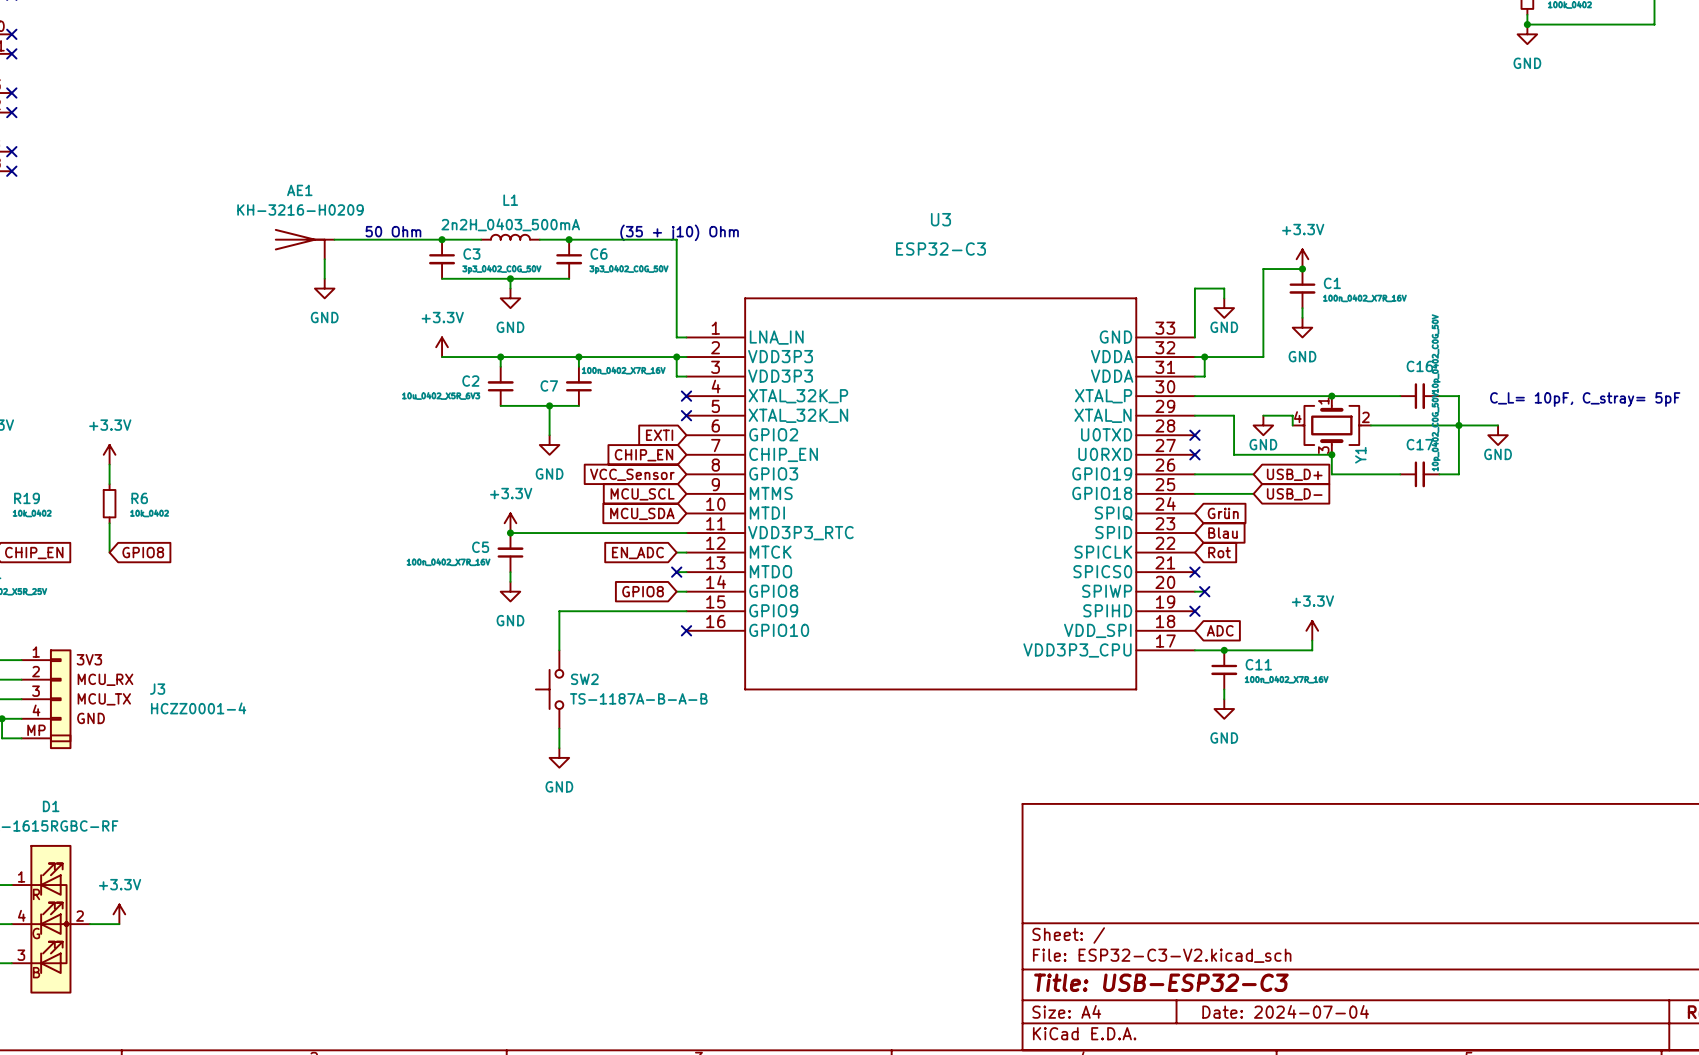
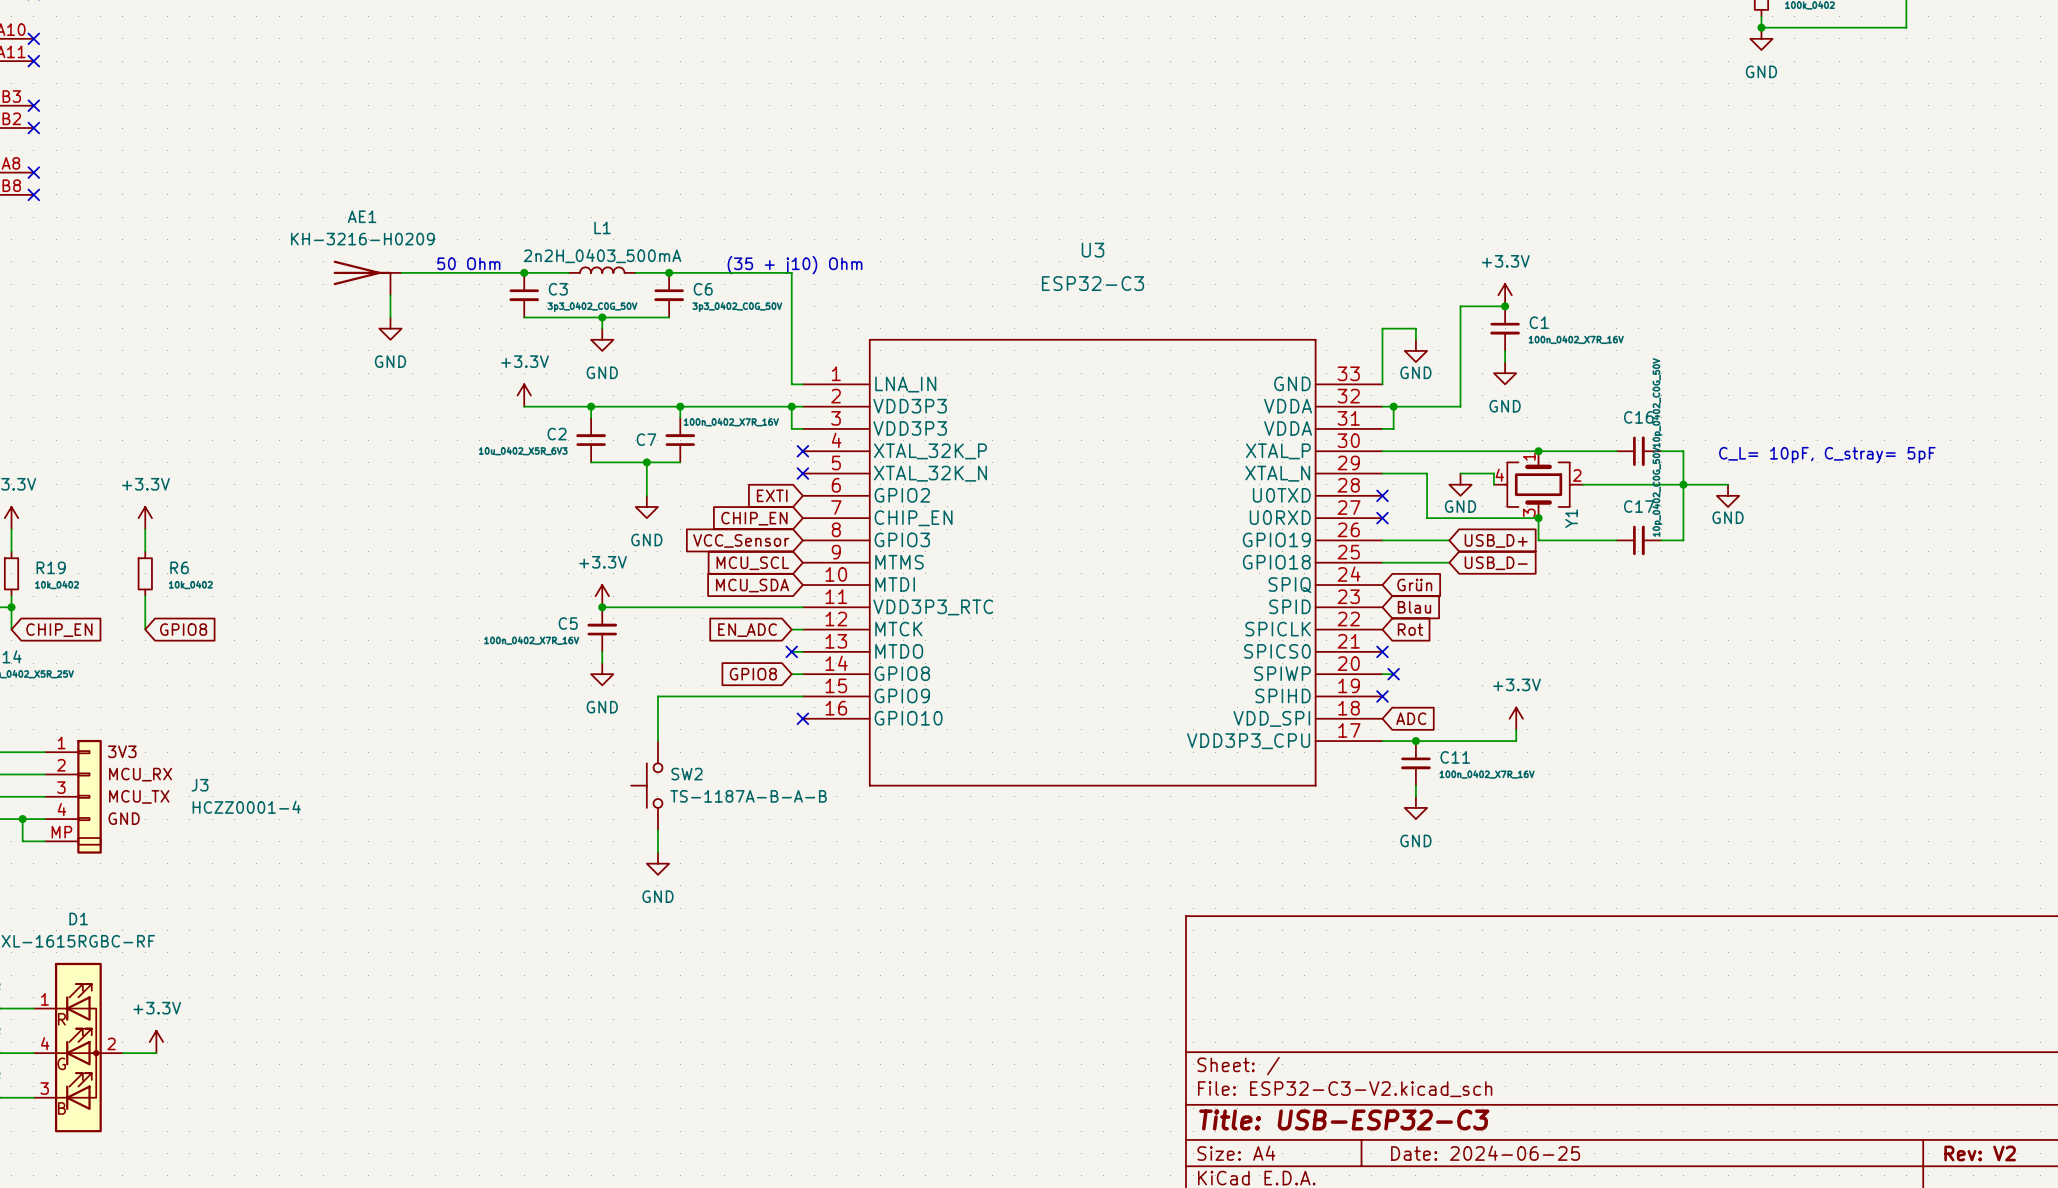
title block: Date: 2024-07-04 (1285, 1011) -> Date: 2024-06-25 (1485, 1153)

